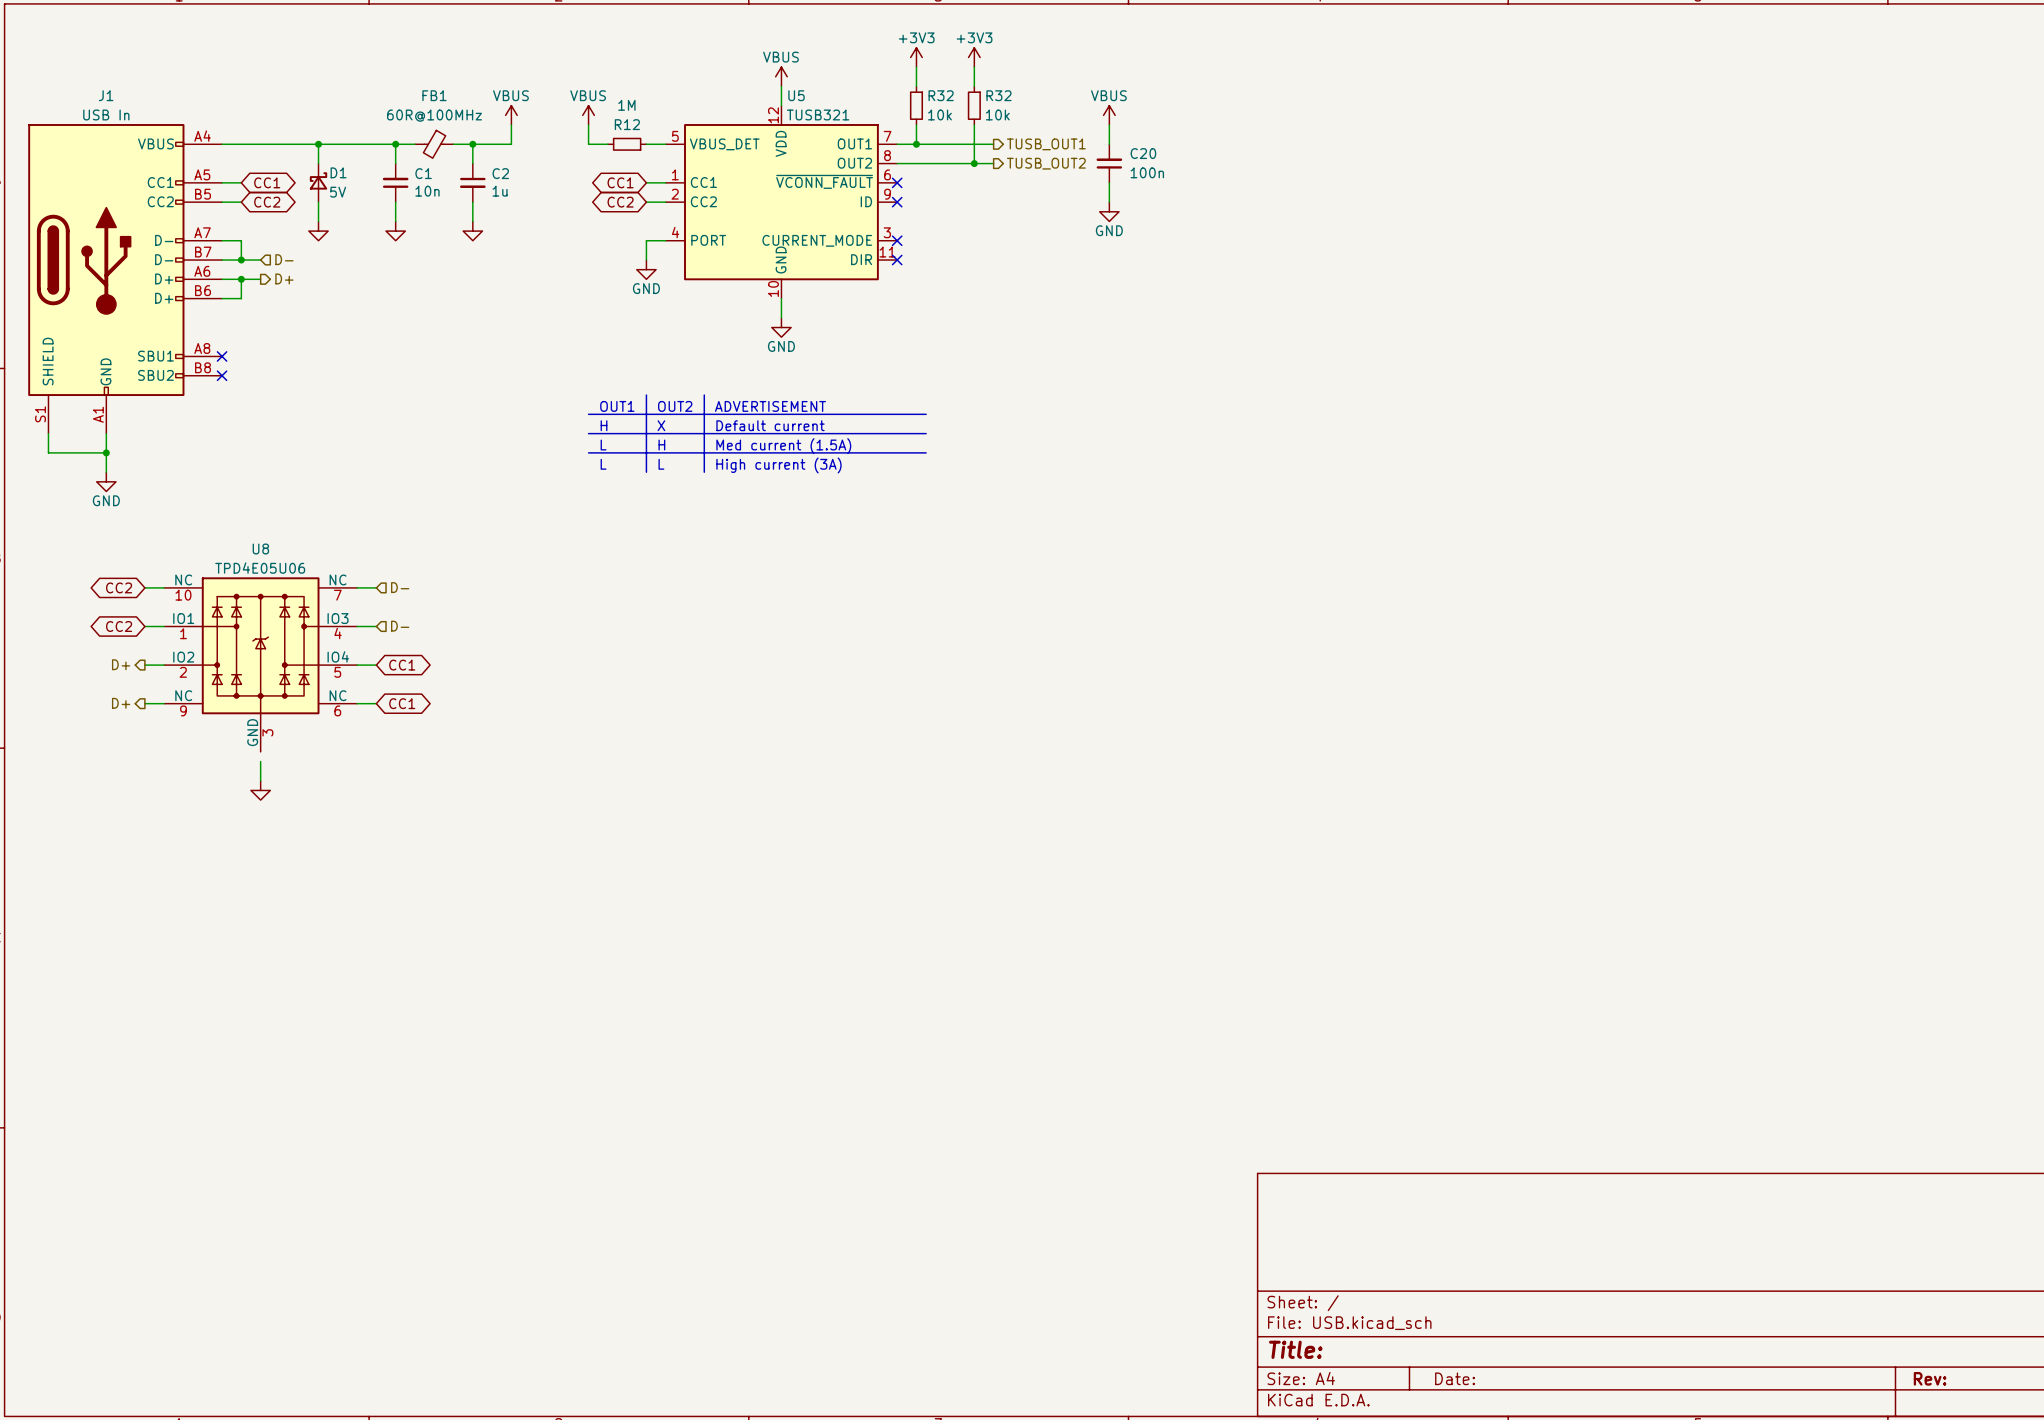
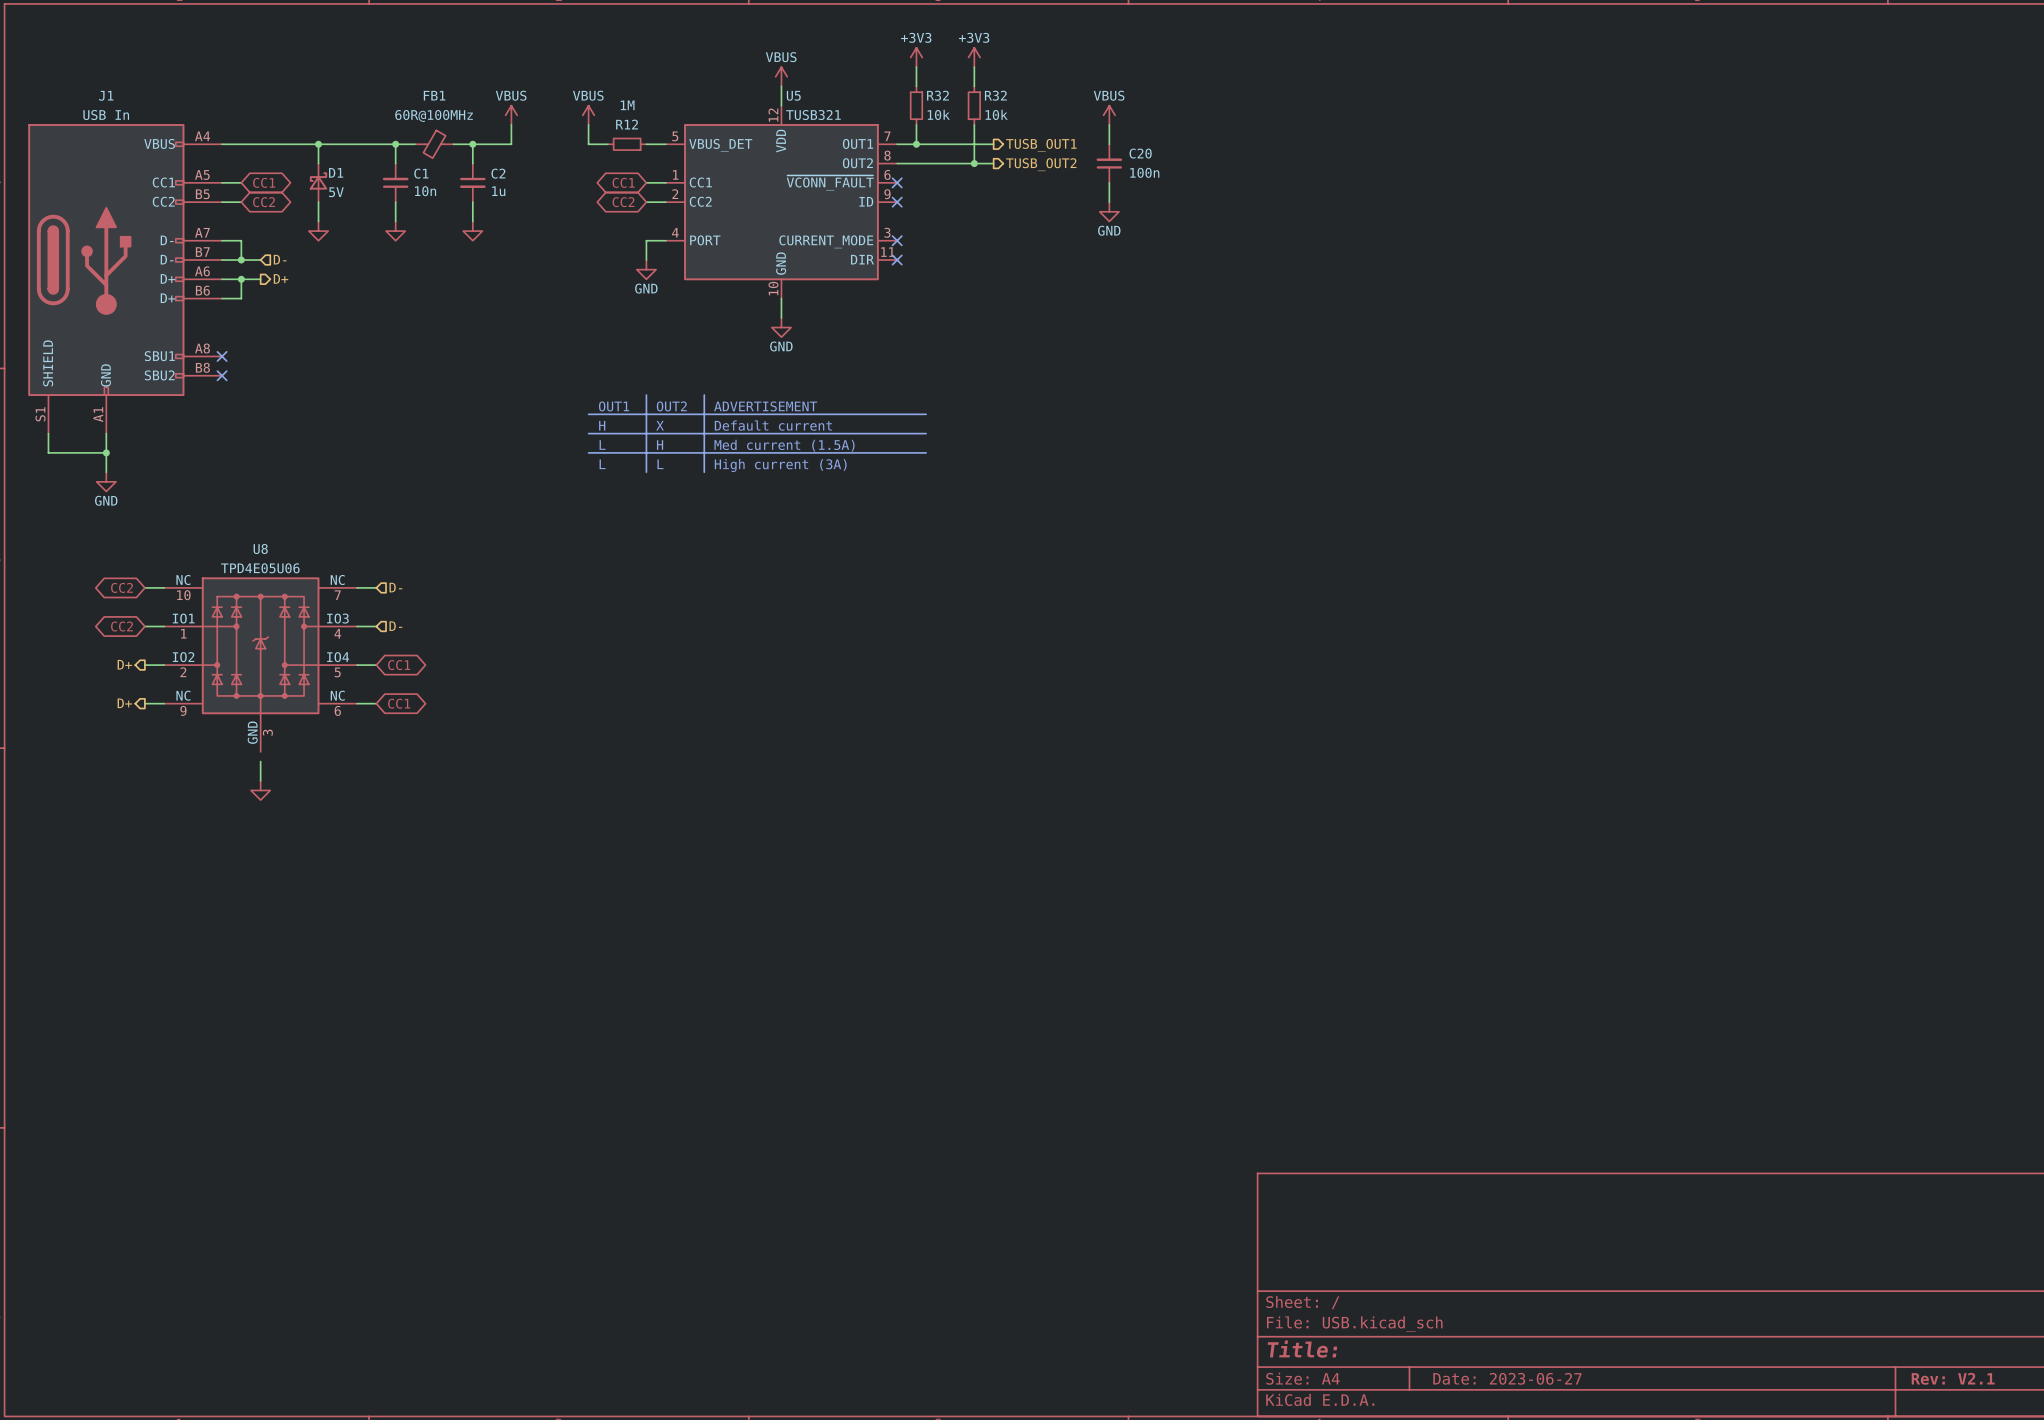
title block: Date: (1454, 1378) -> Date: 2023-06-27 (1507, 1378)
title block: Rev: (1930, 1378) -> Rev: V2.1 (1953, 1378)

